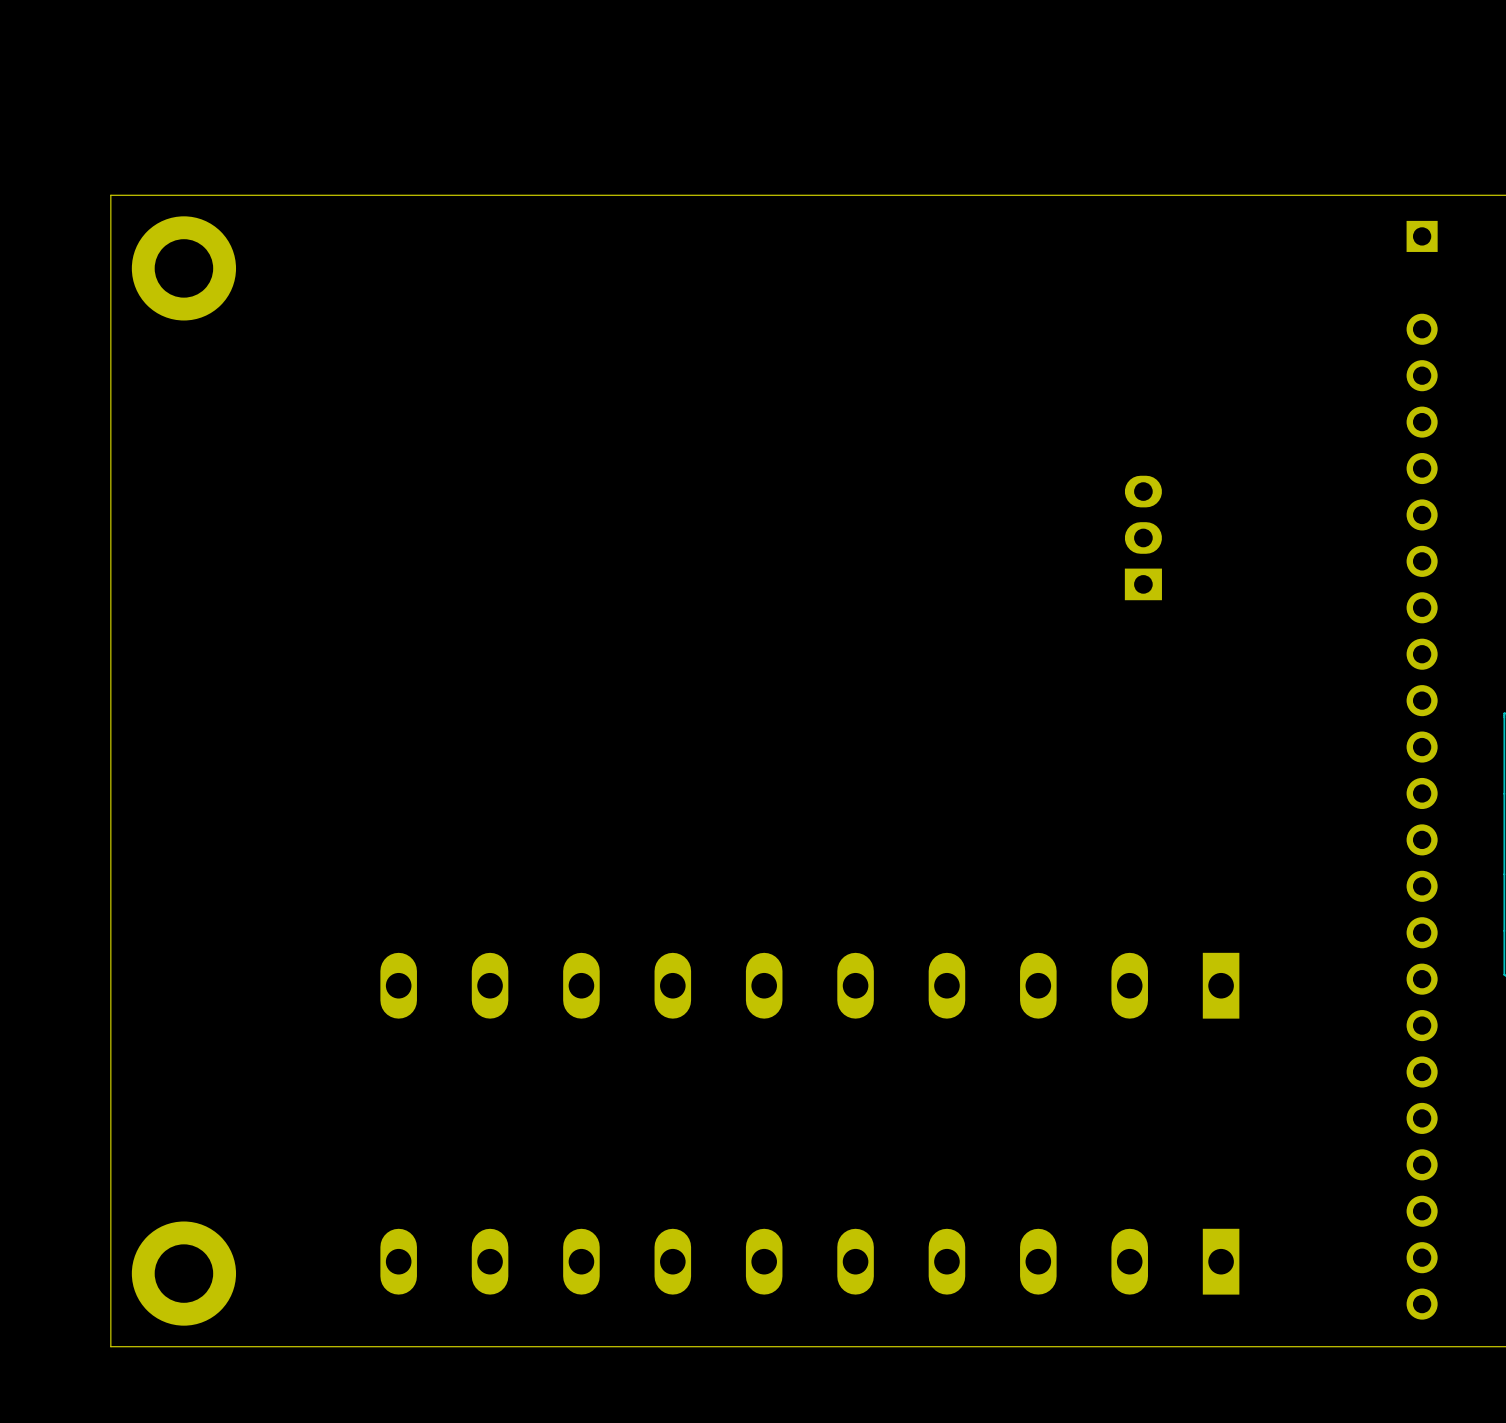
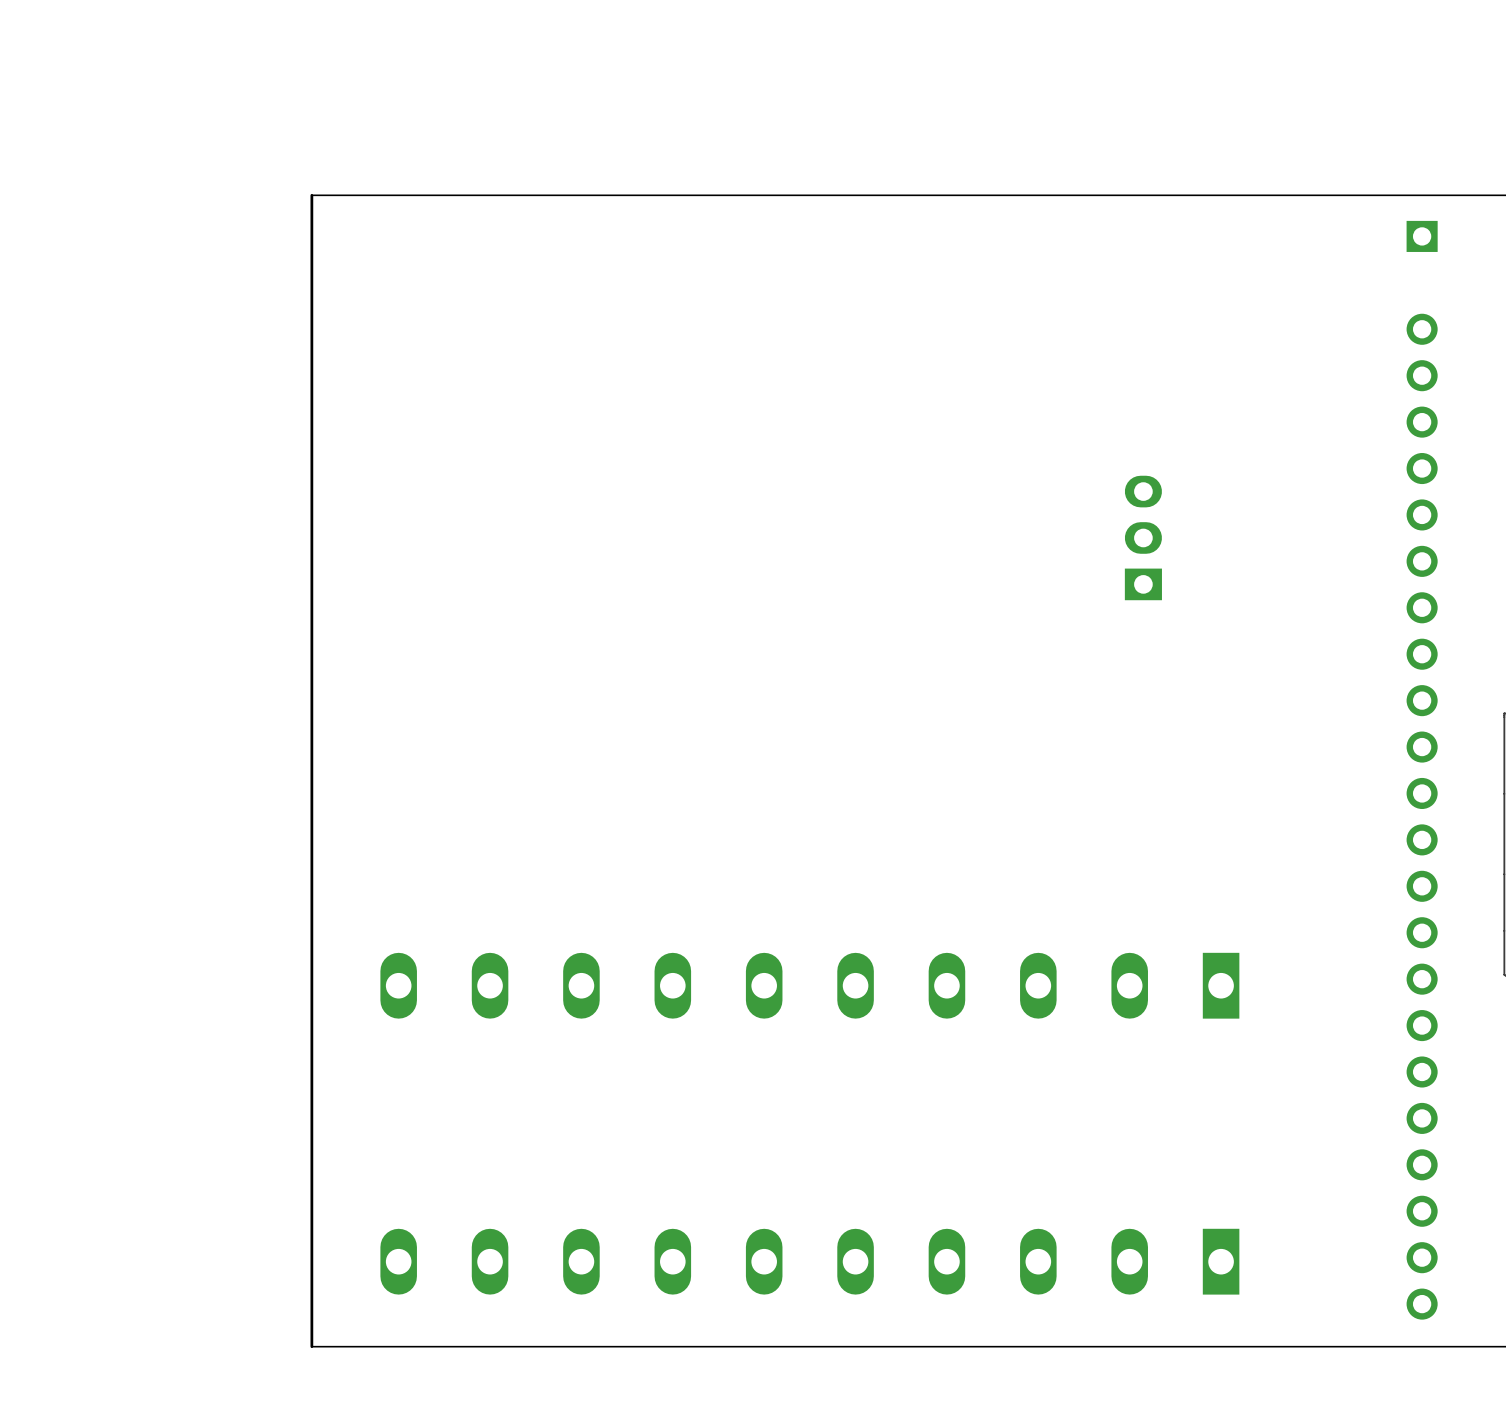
board edge: (311, 195) (110, 195) (110, 1346) (311, 1346) -> (311, 195) (311, 1346)
part: (183, 268) -> none
part: (183, 1273) -> none

